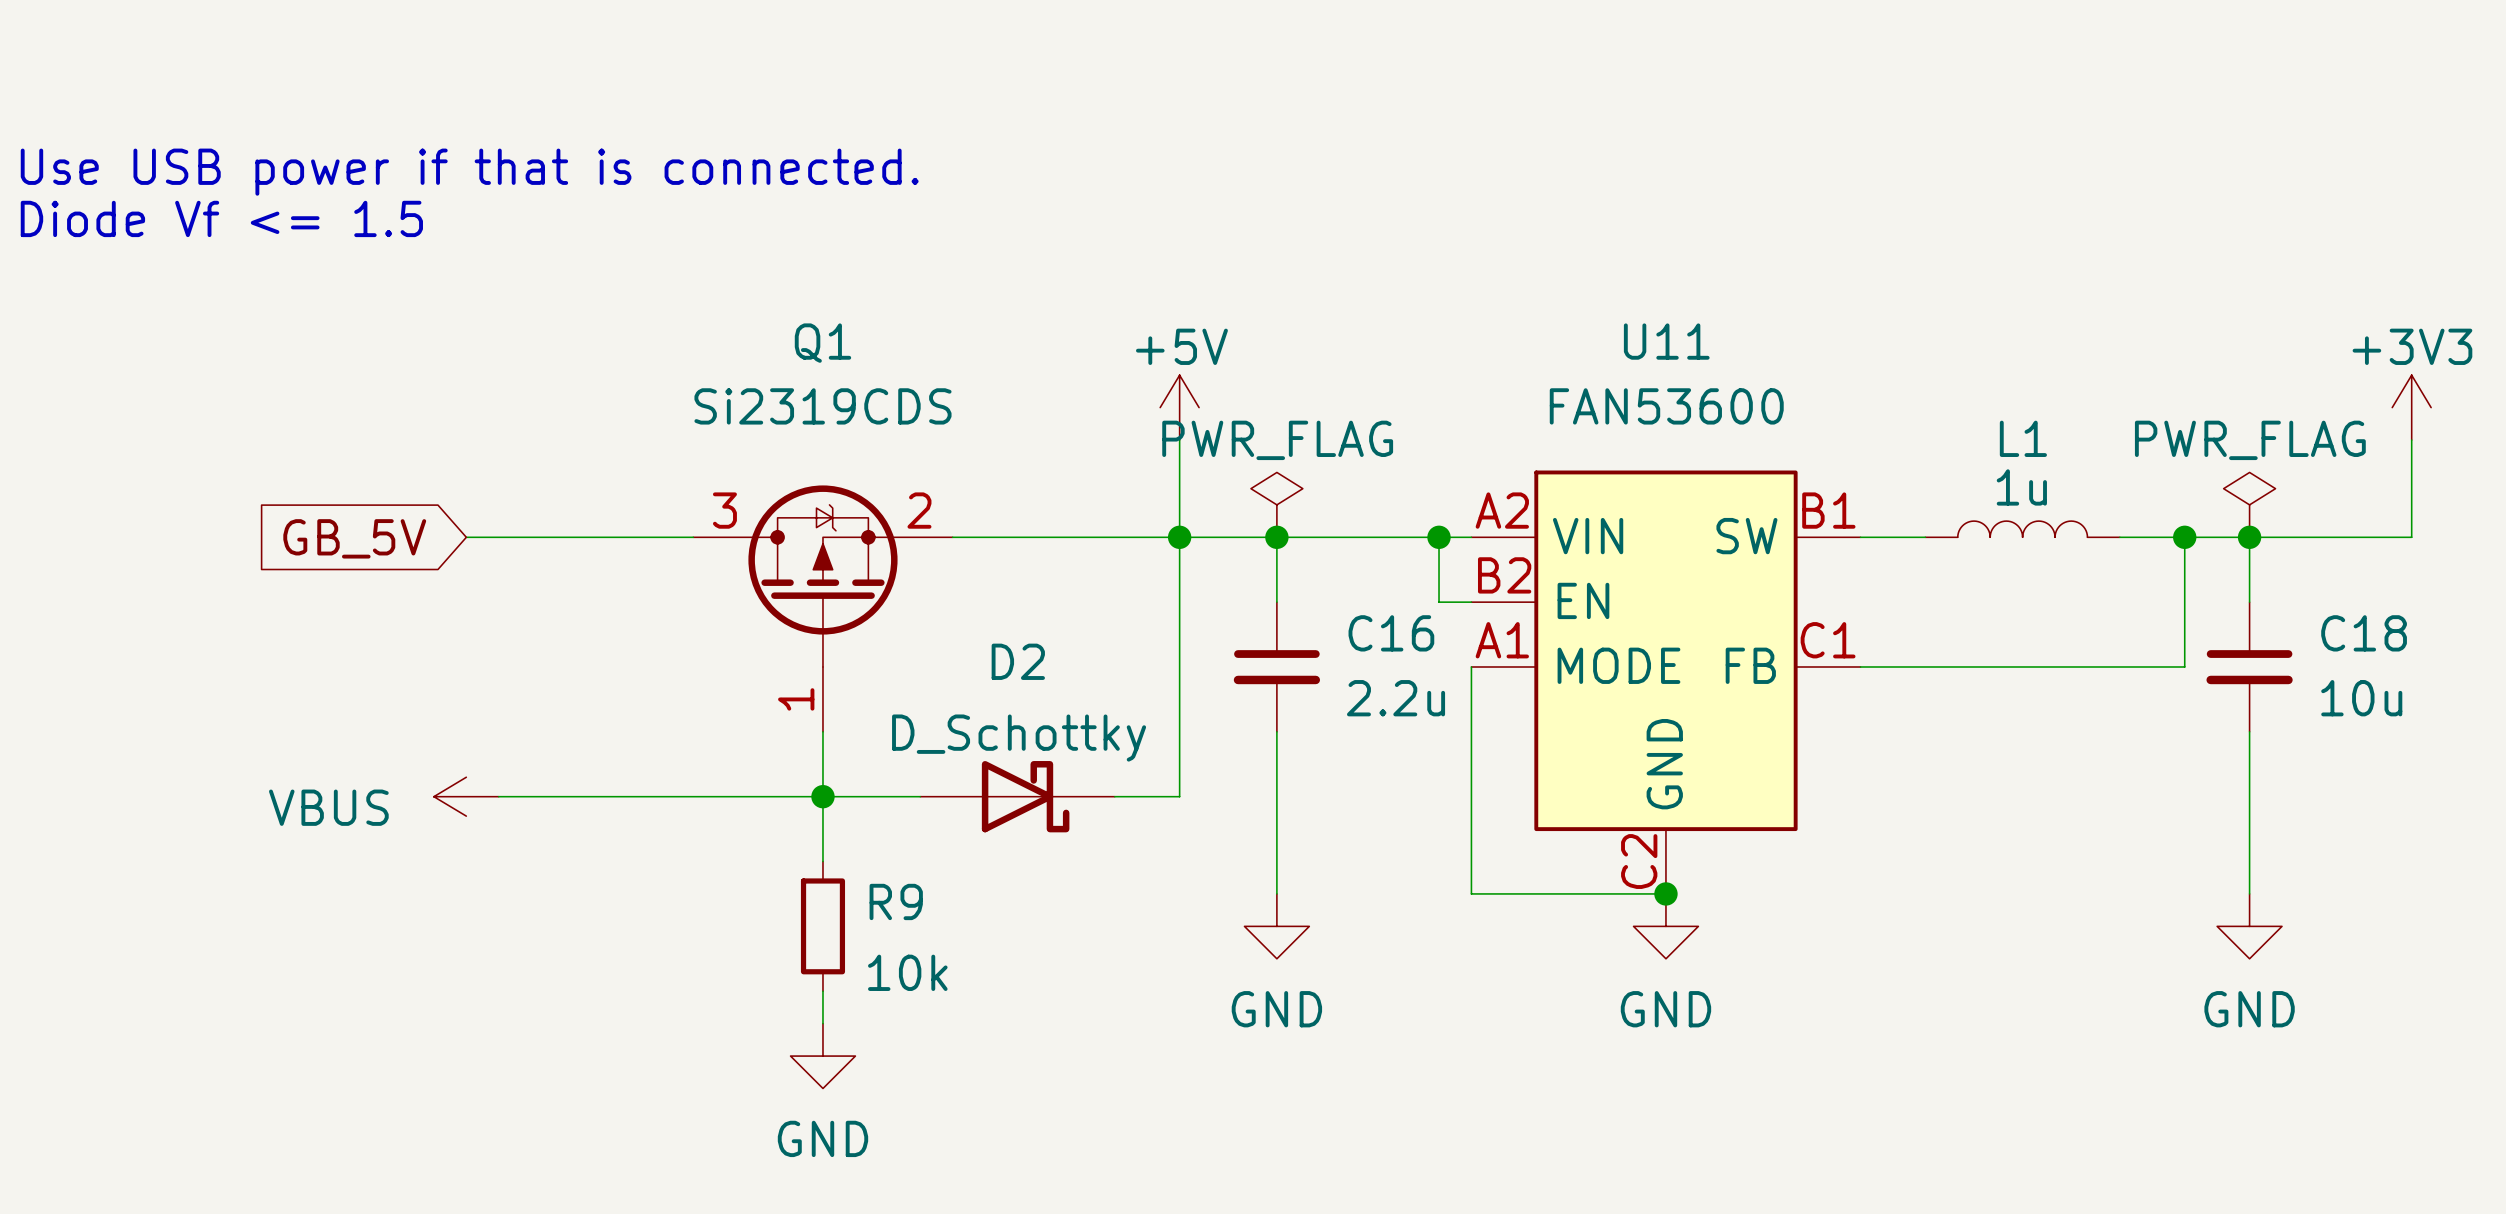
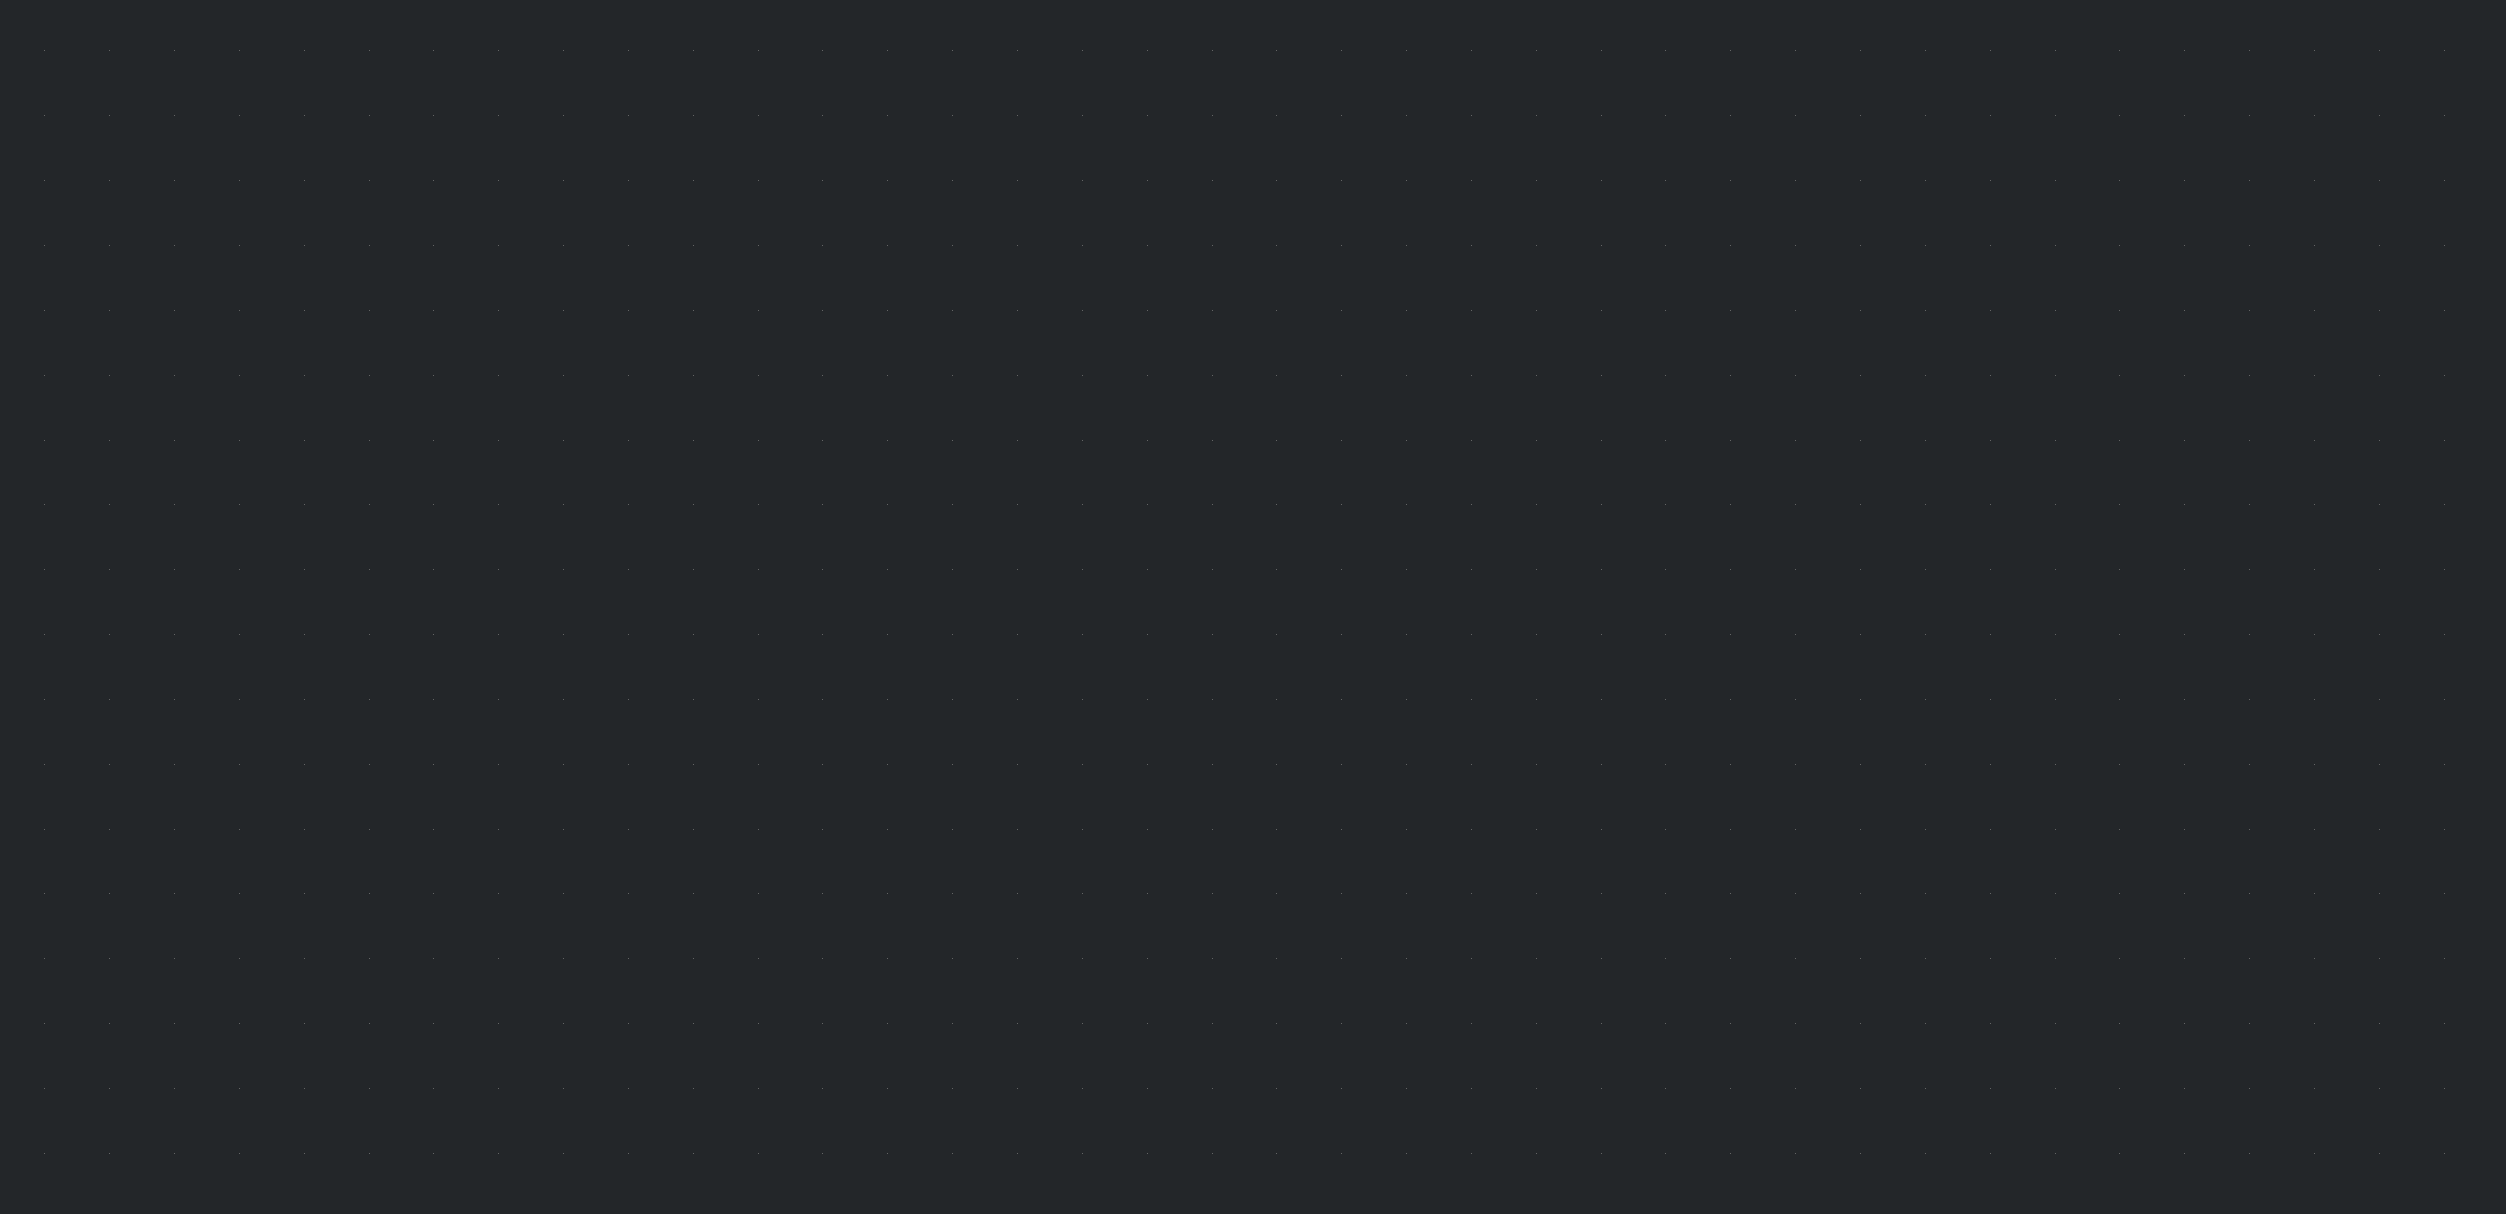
text: Use USB power if that is connected. (469, 172) -> none
text: Diode Vf <= 1.5 (221, 218) -> none
power symbol: +5V (1179, 407) -> none
power symbol: +3V3 (2411, 407) -> none
wire: (1179, 440) (1179, 796) (1114, 796) -> none
wire: (2411, 440) (2411, 537) (2119, 537) -> none
power symbol: PWR_FLAG (1276, 504) -> none
power symbol: PWR_FLAG (2249, 504) -> none
L1: 1u (2022, 529) -> none
wire: (466, 537) (693, 537) -> none
wire: (952, 537) (1471, 537) -> none
junction: (1179, 537) -> none
wire: (1276, 537) (1276, 602) -> none
junction: (1276, 537) -> none
wire: (1439, 537) (1439, 602) (1471, 602) -> none
junction: (1439, 537) -> none
wire: (1860, 537) (1925, 537) -> none
wire: (2184, 537) (2184, 666) (1860, 666) -> none
junction: (2184, 537) -> none
wire: (2249, 537) (2249, 602) -> none
junction: (2249, 537) -> none
global label: GB_5V (354, 538) -> none
Q1: Si2319CDS (822, 608) -> none
C16: 2.2u (1276, 666) -> none
wire: (1471, 666) (1471, 893) (1665, 893) -> none
C18: 10u (2249, 666) -> none
U11: FAN53600 (1665, 682) -> none
wire: (822, 731) (822, 861) -> none
wire: (1276, 731) (1276, 893) -> none
wire: (2249, 731) (2249, 893) -> none
power symbol: VBUS (466, 796) -> none
wire: (498, 796) (920, 796) -> none
junction: (822, 796) -> none
D2: D_Schottky (1017, 796) -> none
junction: (1665, 893) -> none
R9: 10k (822, 926) -> none
power symbol: GND (1276, 926) -> none
power symbol: GND (1665, 926) -> none
power symbol: GND (2249, 926) -> none
wire: (822, 991) (822, 1023) -> none
power symbol: GND (822, 1056) -> none

